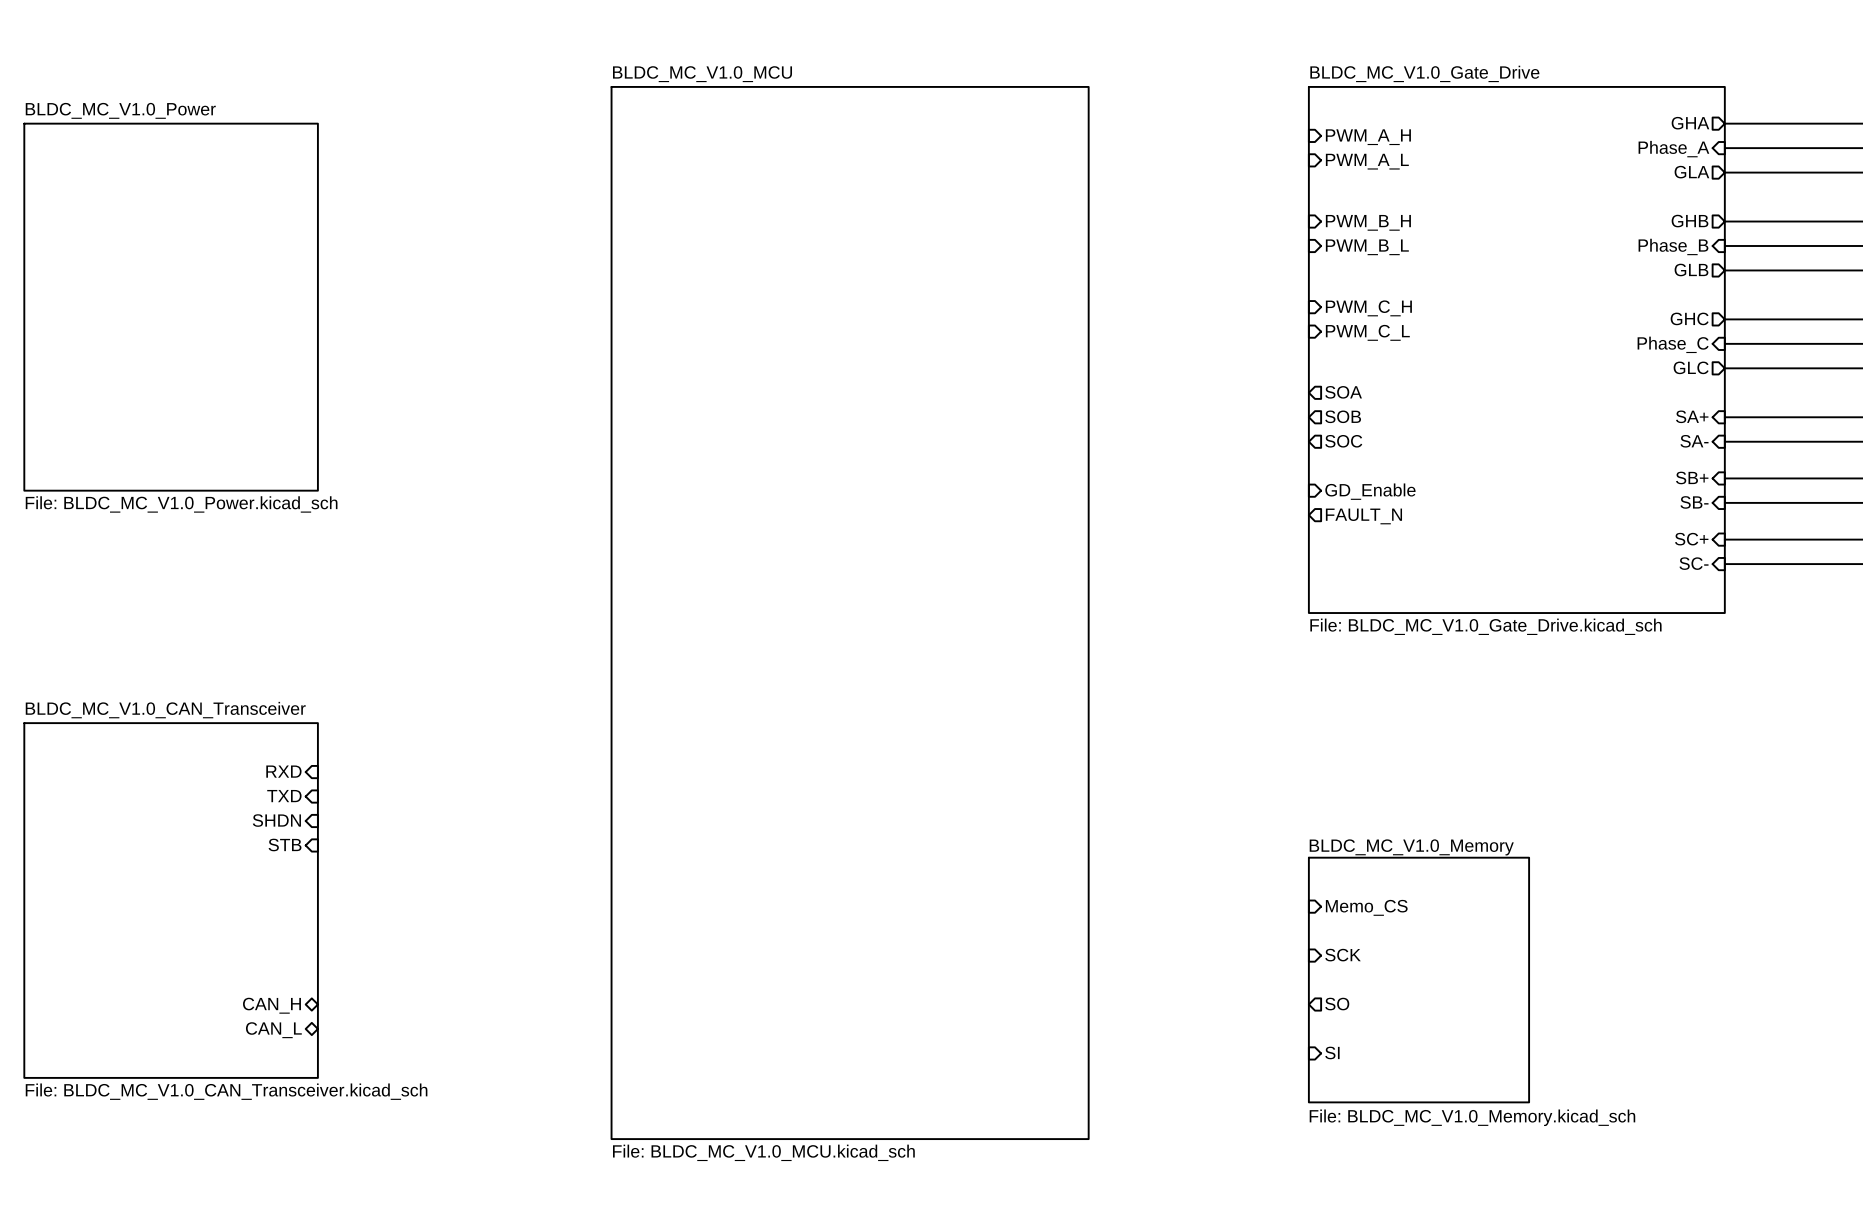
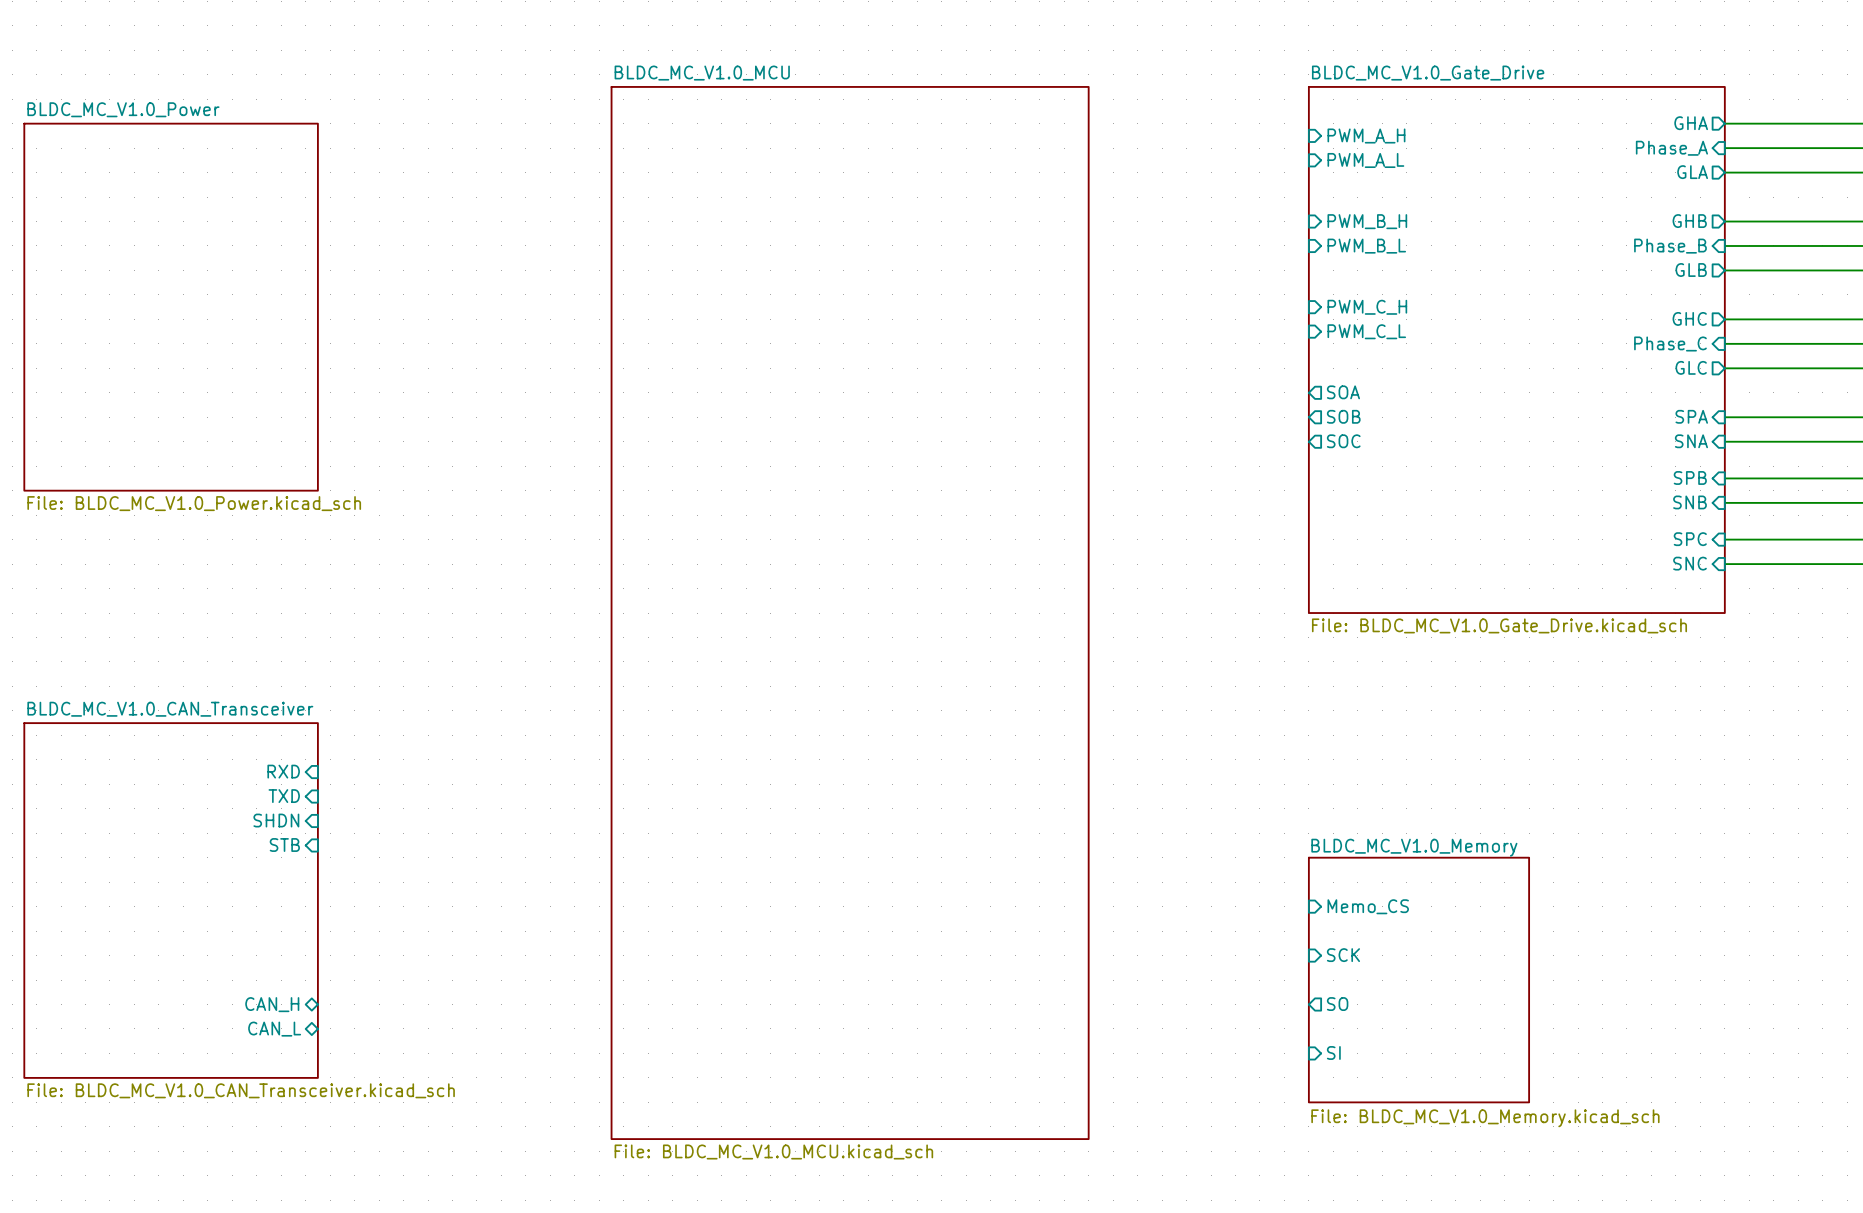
sheet pin: SA+ (1692, 416) -> SPA (1691, 416)
sheet pin: SA- (1694, 441) -> SNA (1691, 441)
sheet pin: SB+ (1692, 477) -> SPB (1690, 477)
sheet pin: GD_Enable (1370, 491) -> none
sheet pin: SB- (1694, 502) -> SNB (1689, 502)
sheet pin: FAULT_N (1363, 516) -> none
sheet pin: SC+ (1691, 539) -> SPC (1690, 539)
sheet pin: SC- (1694, 563) -> SNC (1689, 563)

